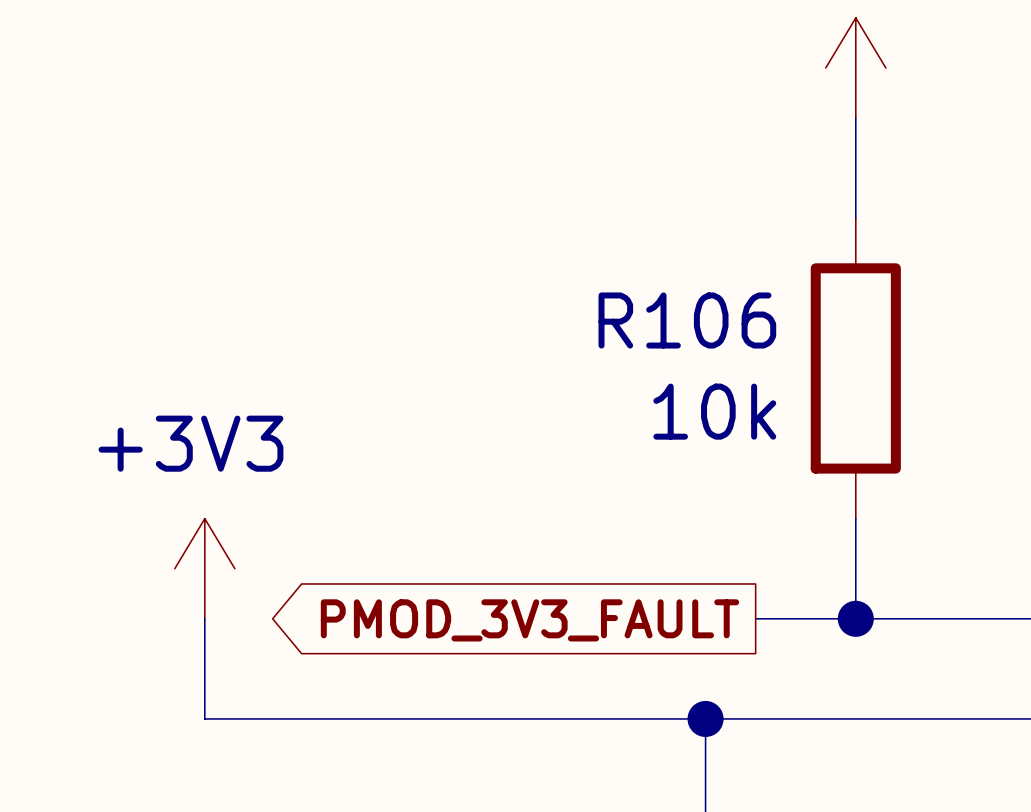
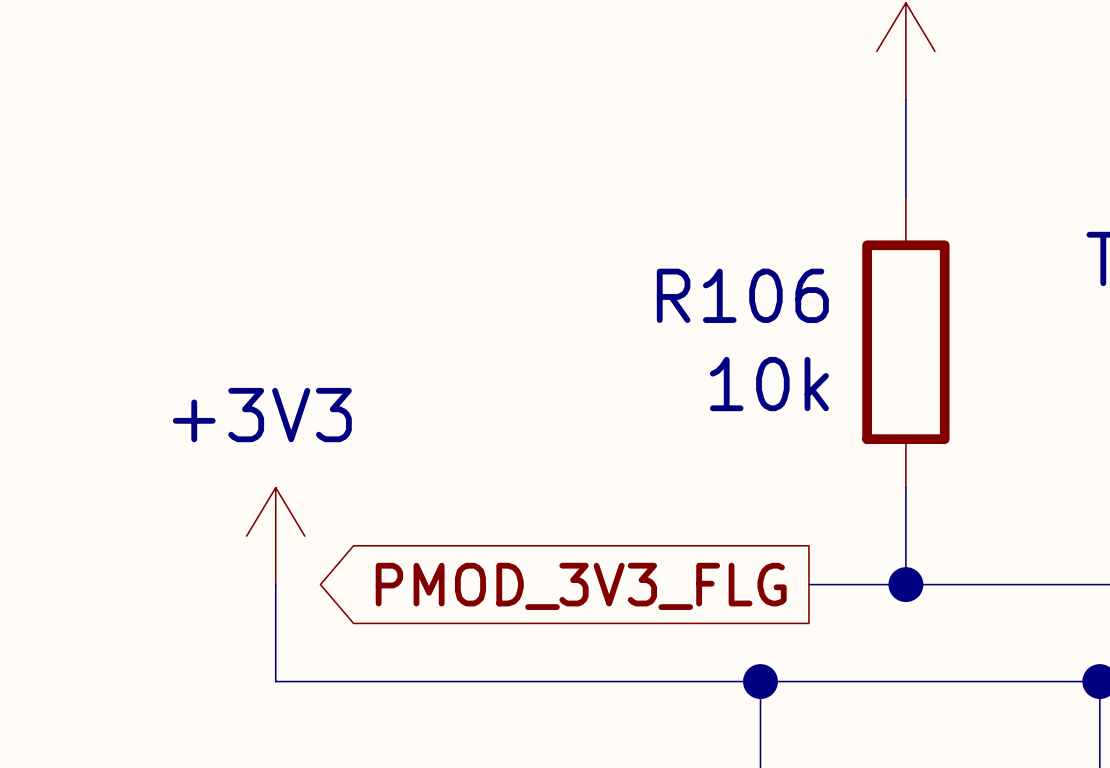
global label: PMOD_3V3_FAULT (529, 620) -> PMOD_3V3_FLG (581, 586)

